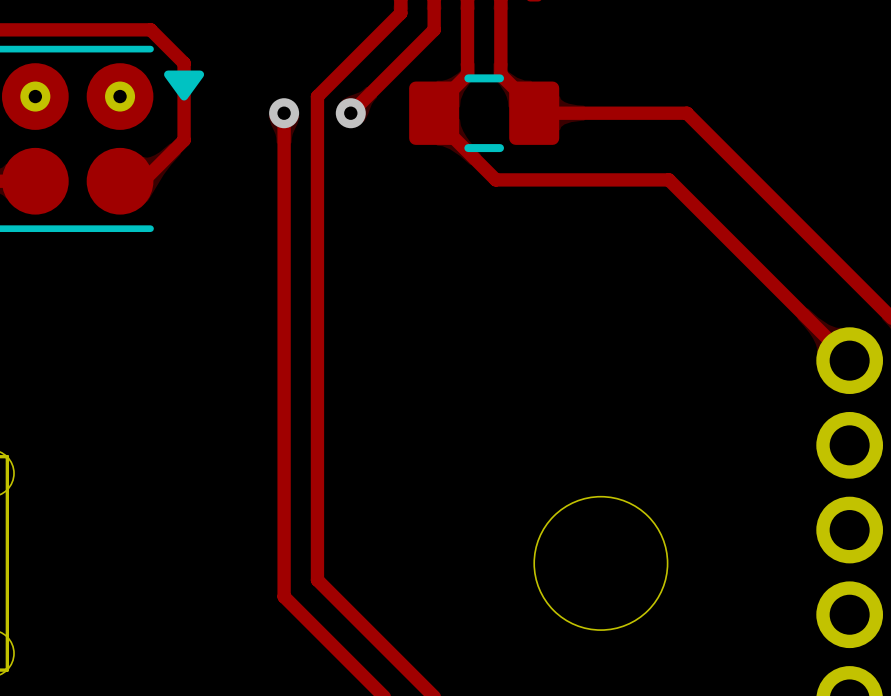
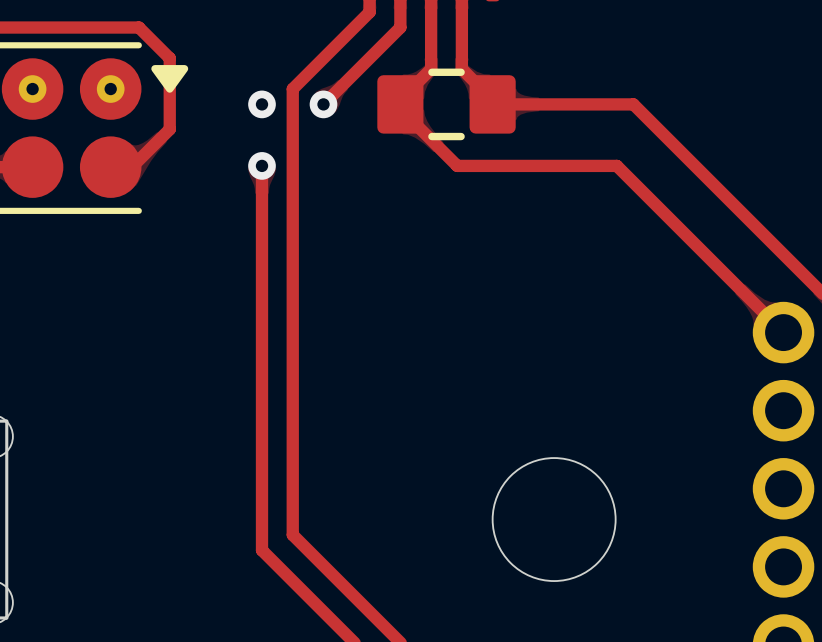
track: (284, 113) (284, 179) -> none
via: none -> (262, 165)

